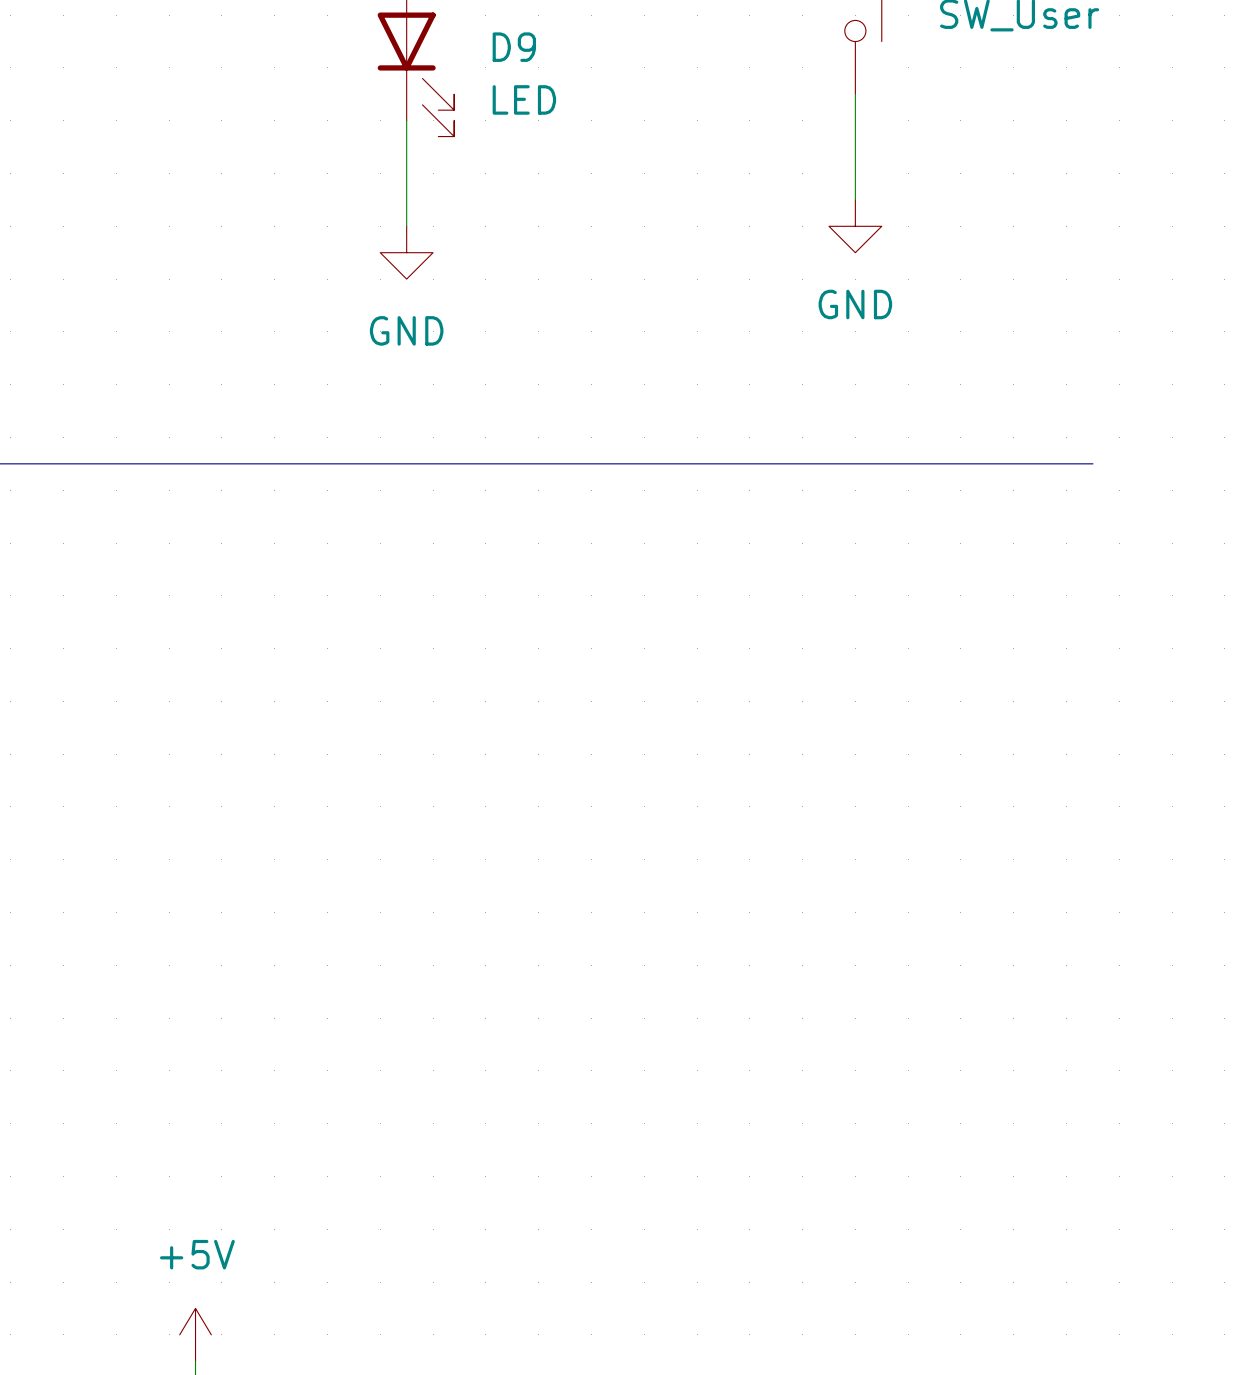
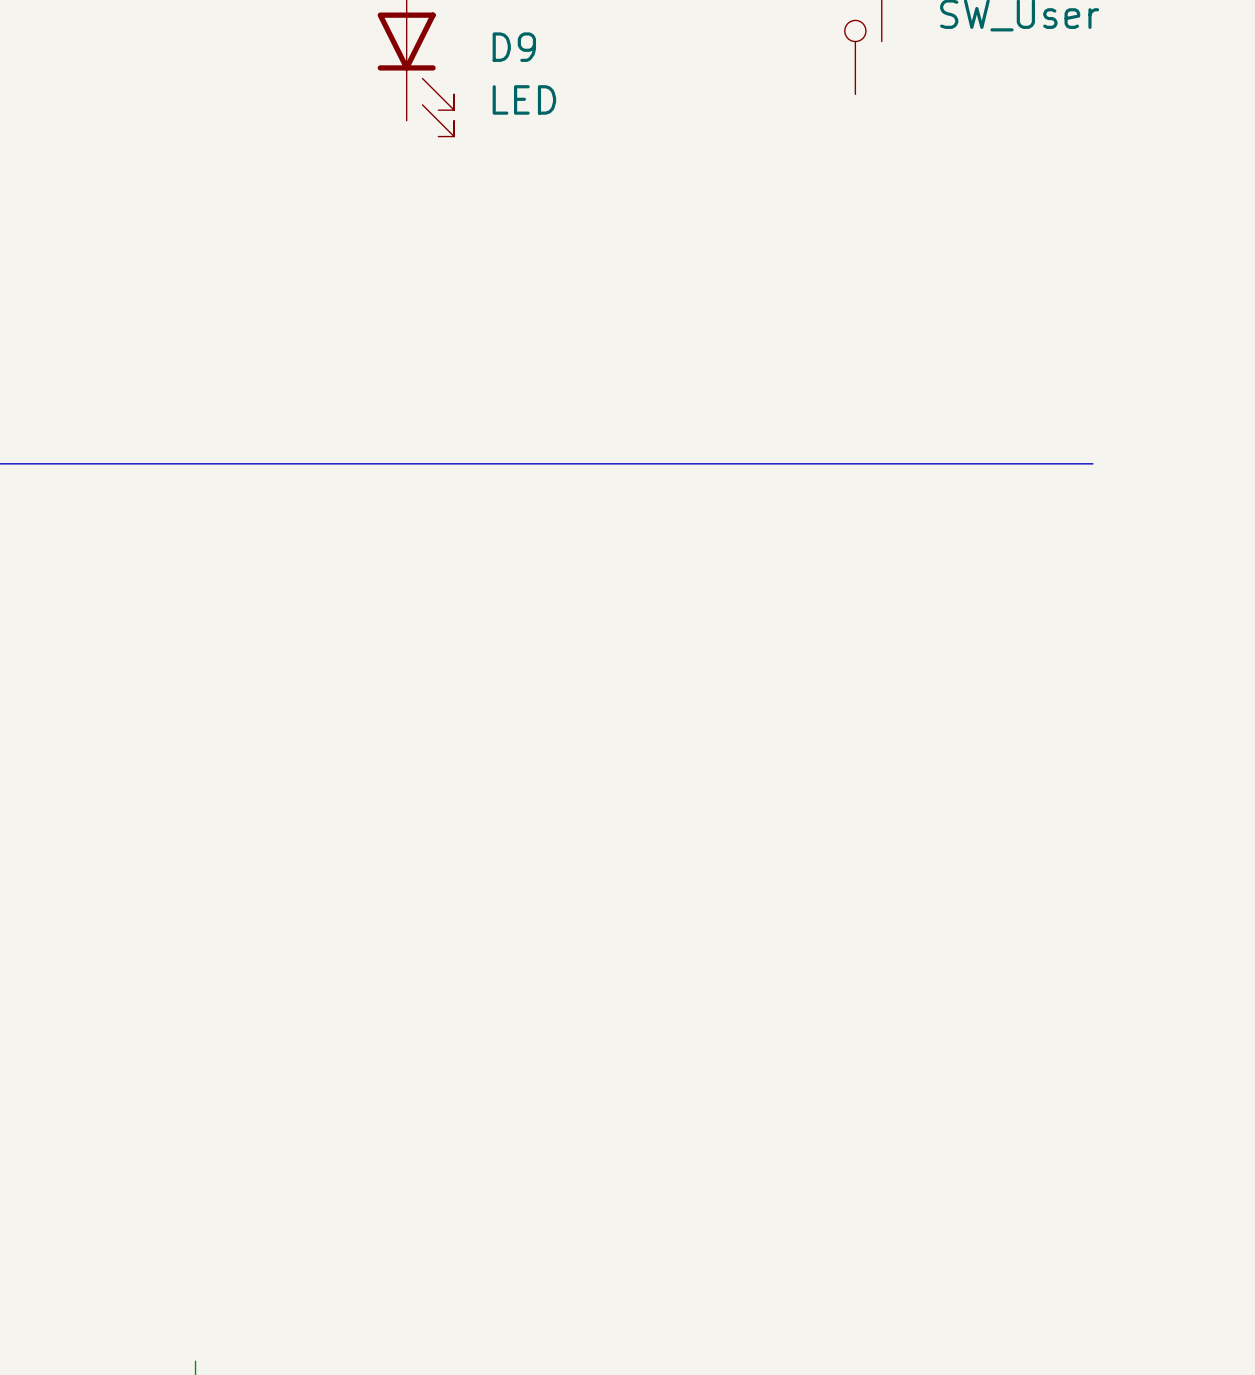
wire: (855, 94) (855, 199) -> none
wire: (406, 120) (406, 226) -> none
power symbol: GND (855, 226) -> none
power symbol: GND (406, 252) -> none
power symbol: +5V (195, 1334) -> none

